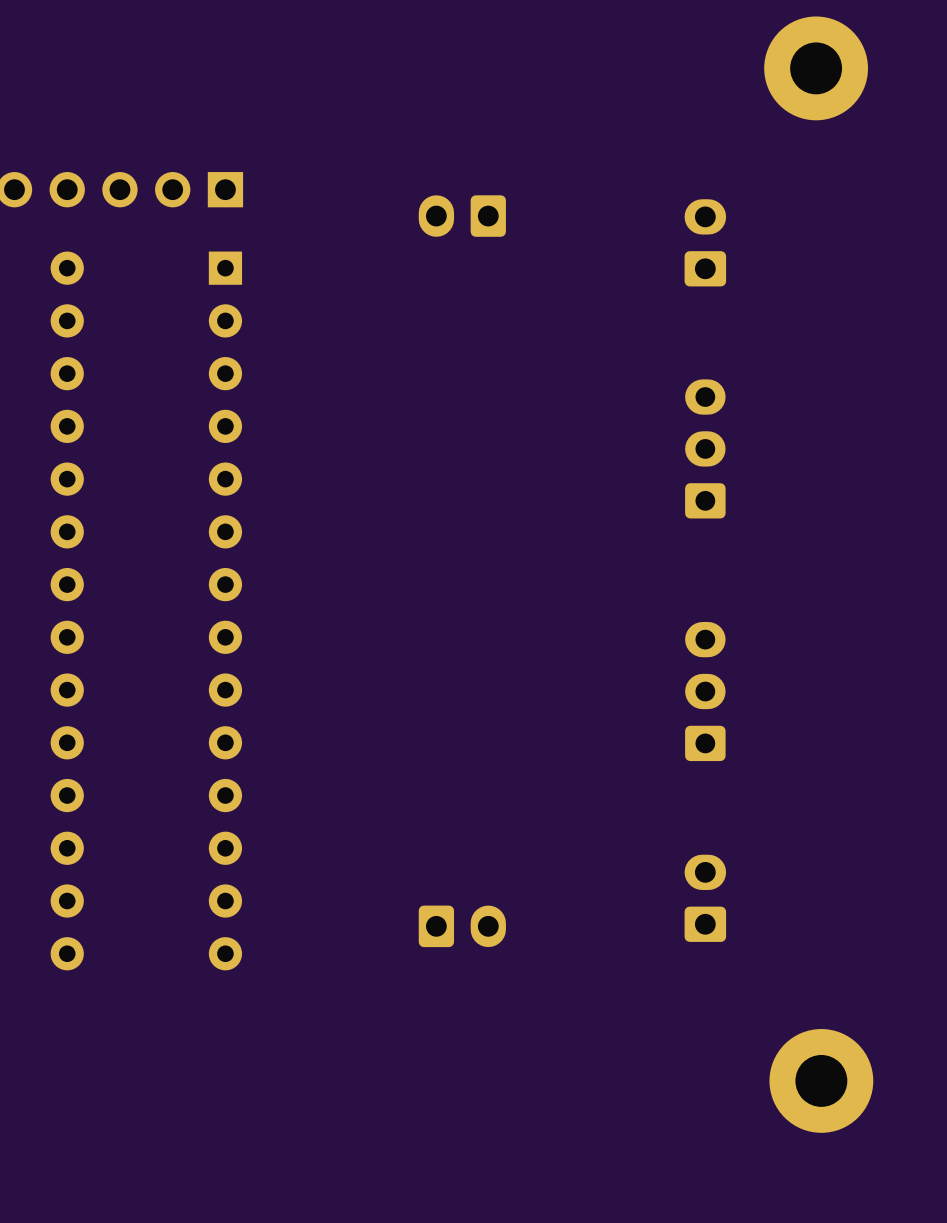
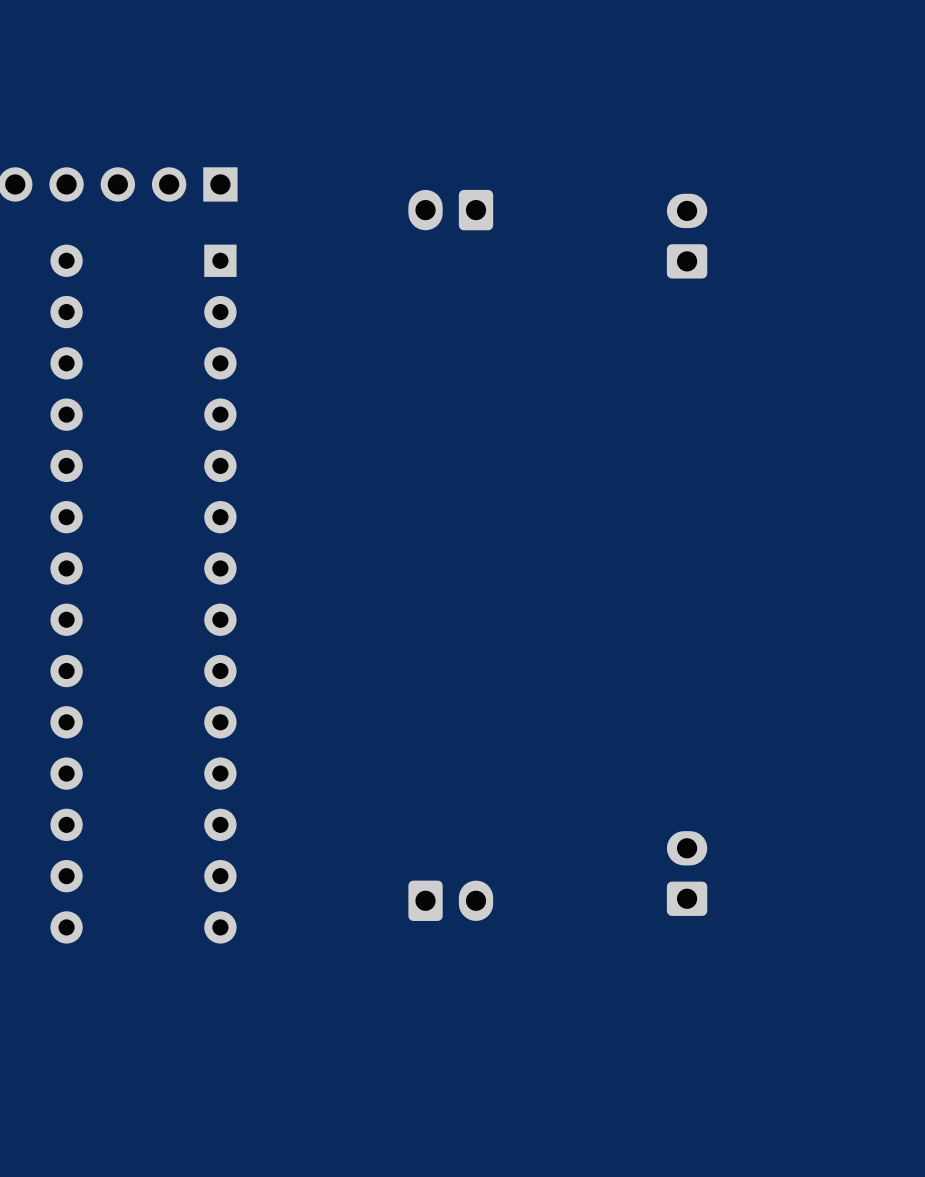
part: (816, 68) -> none
part: (705, 448) -> none
part: (705, 691) -> none
part: (821, 1080) -> none

